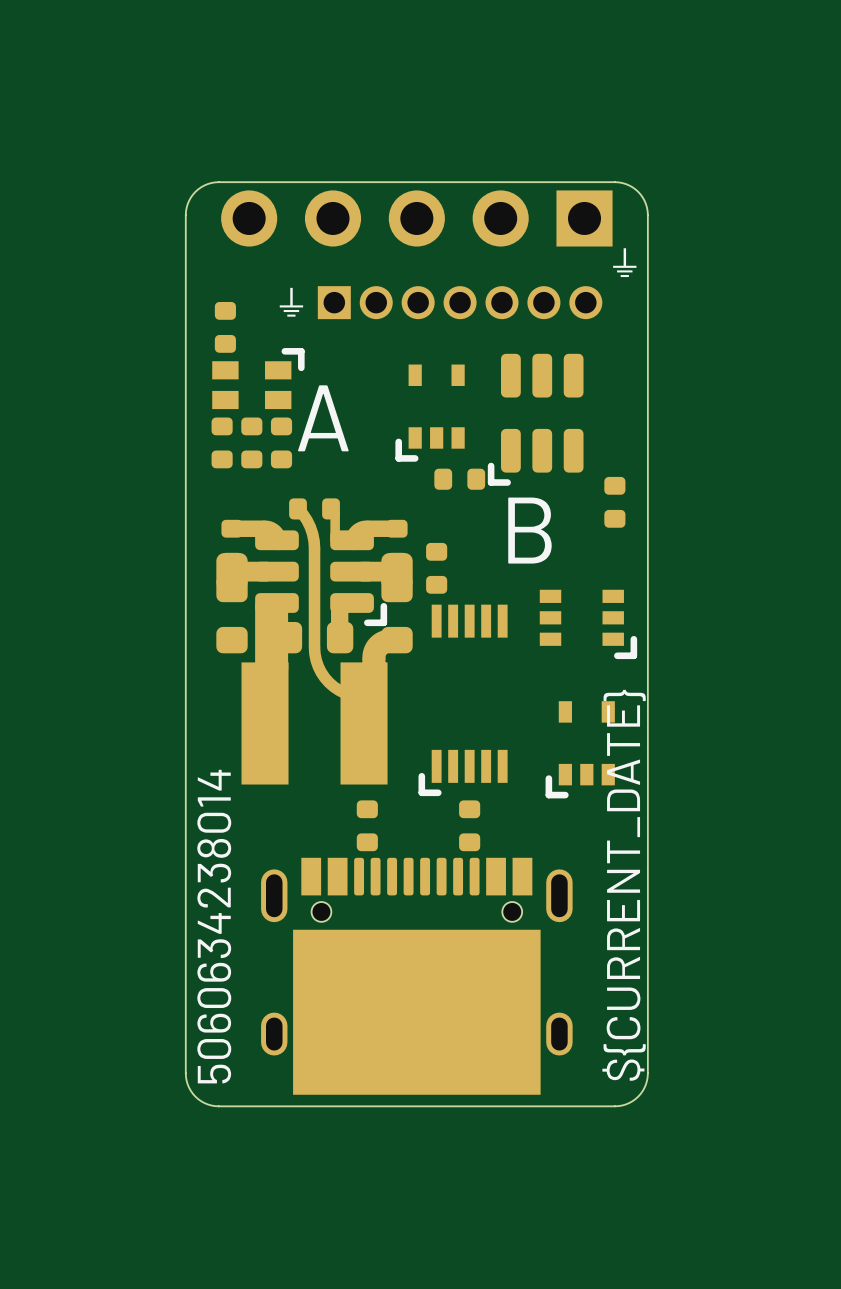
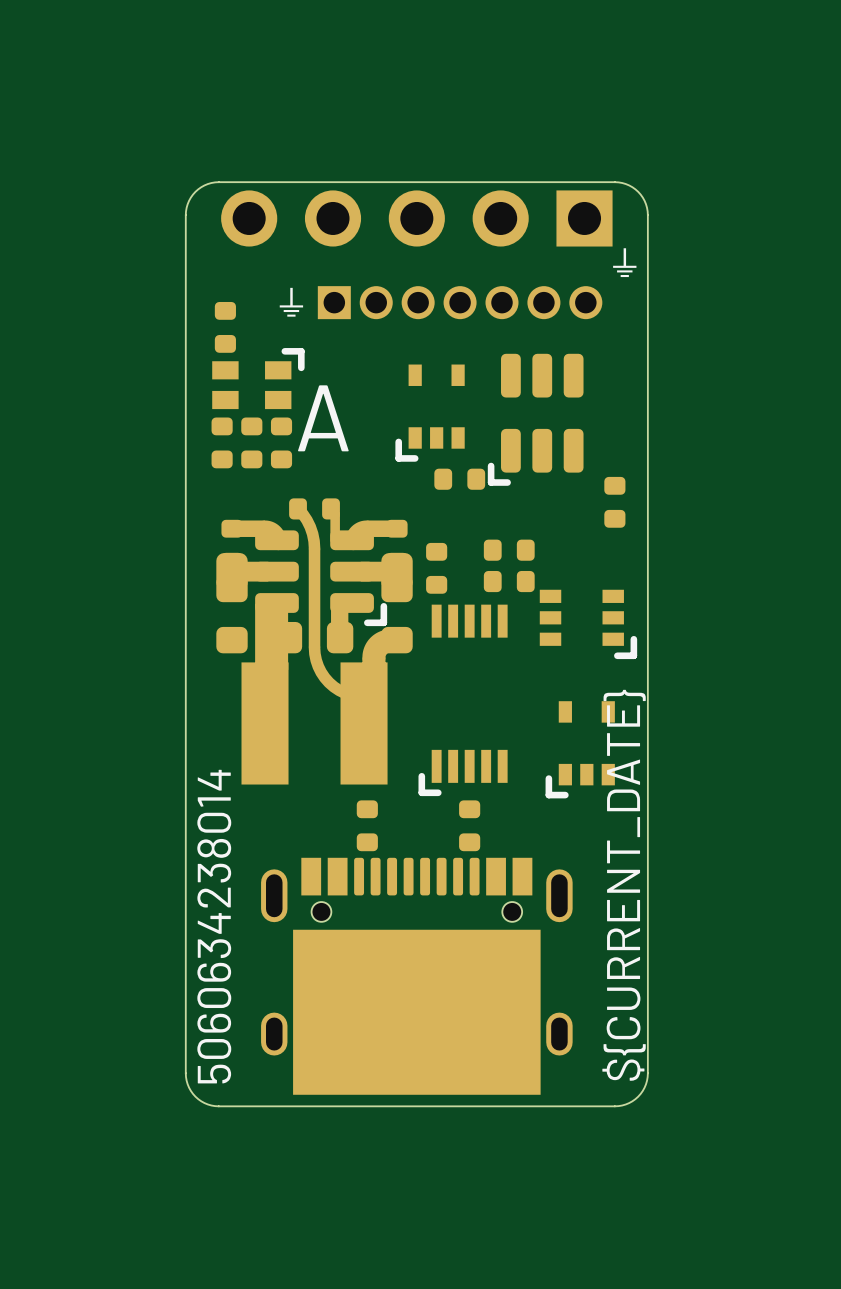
text: B (529, 530) -> none
part: none -> (509, 550)
part: none -> (509, 581)

